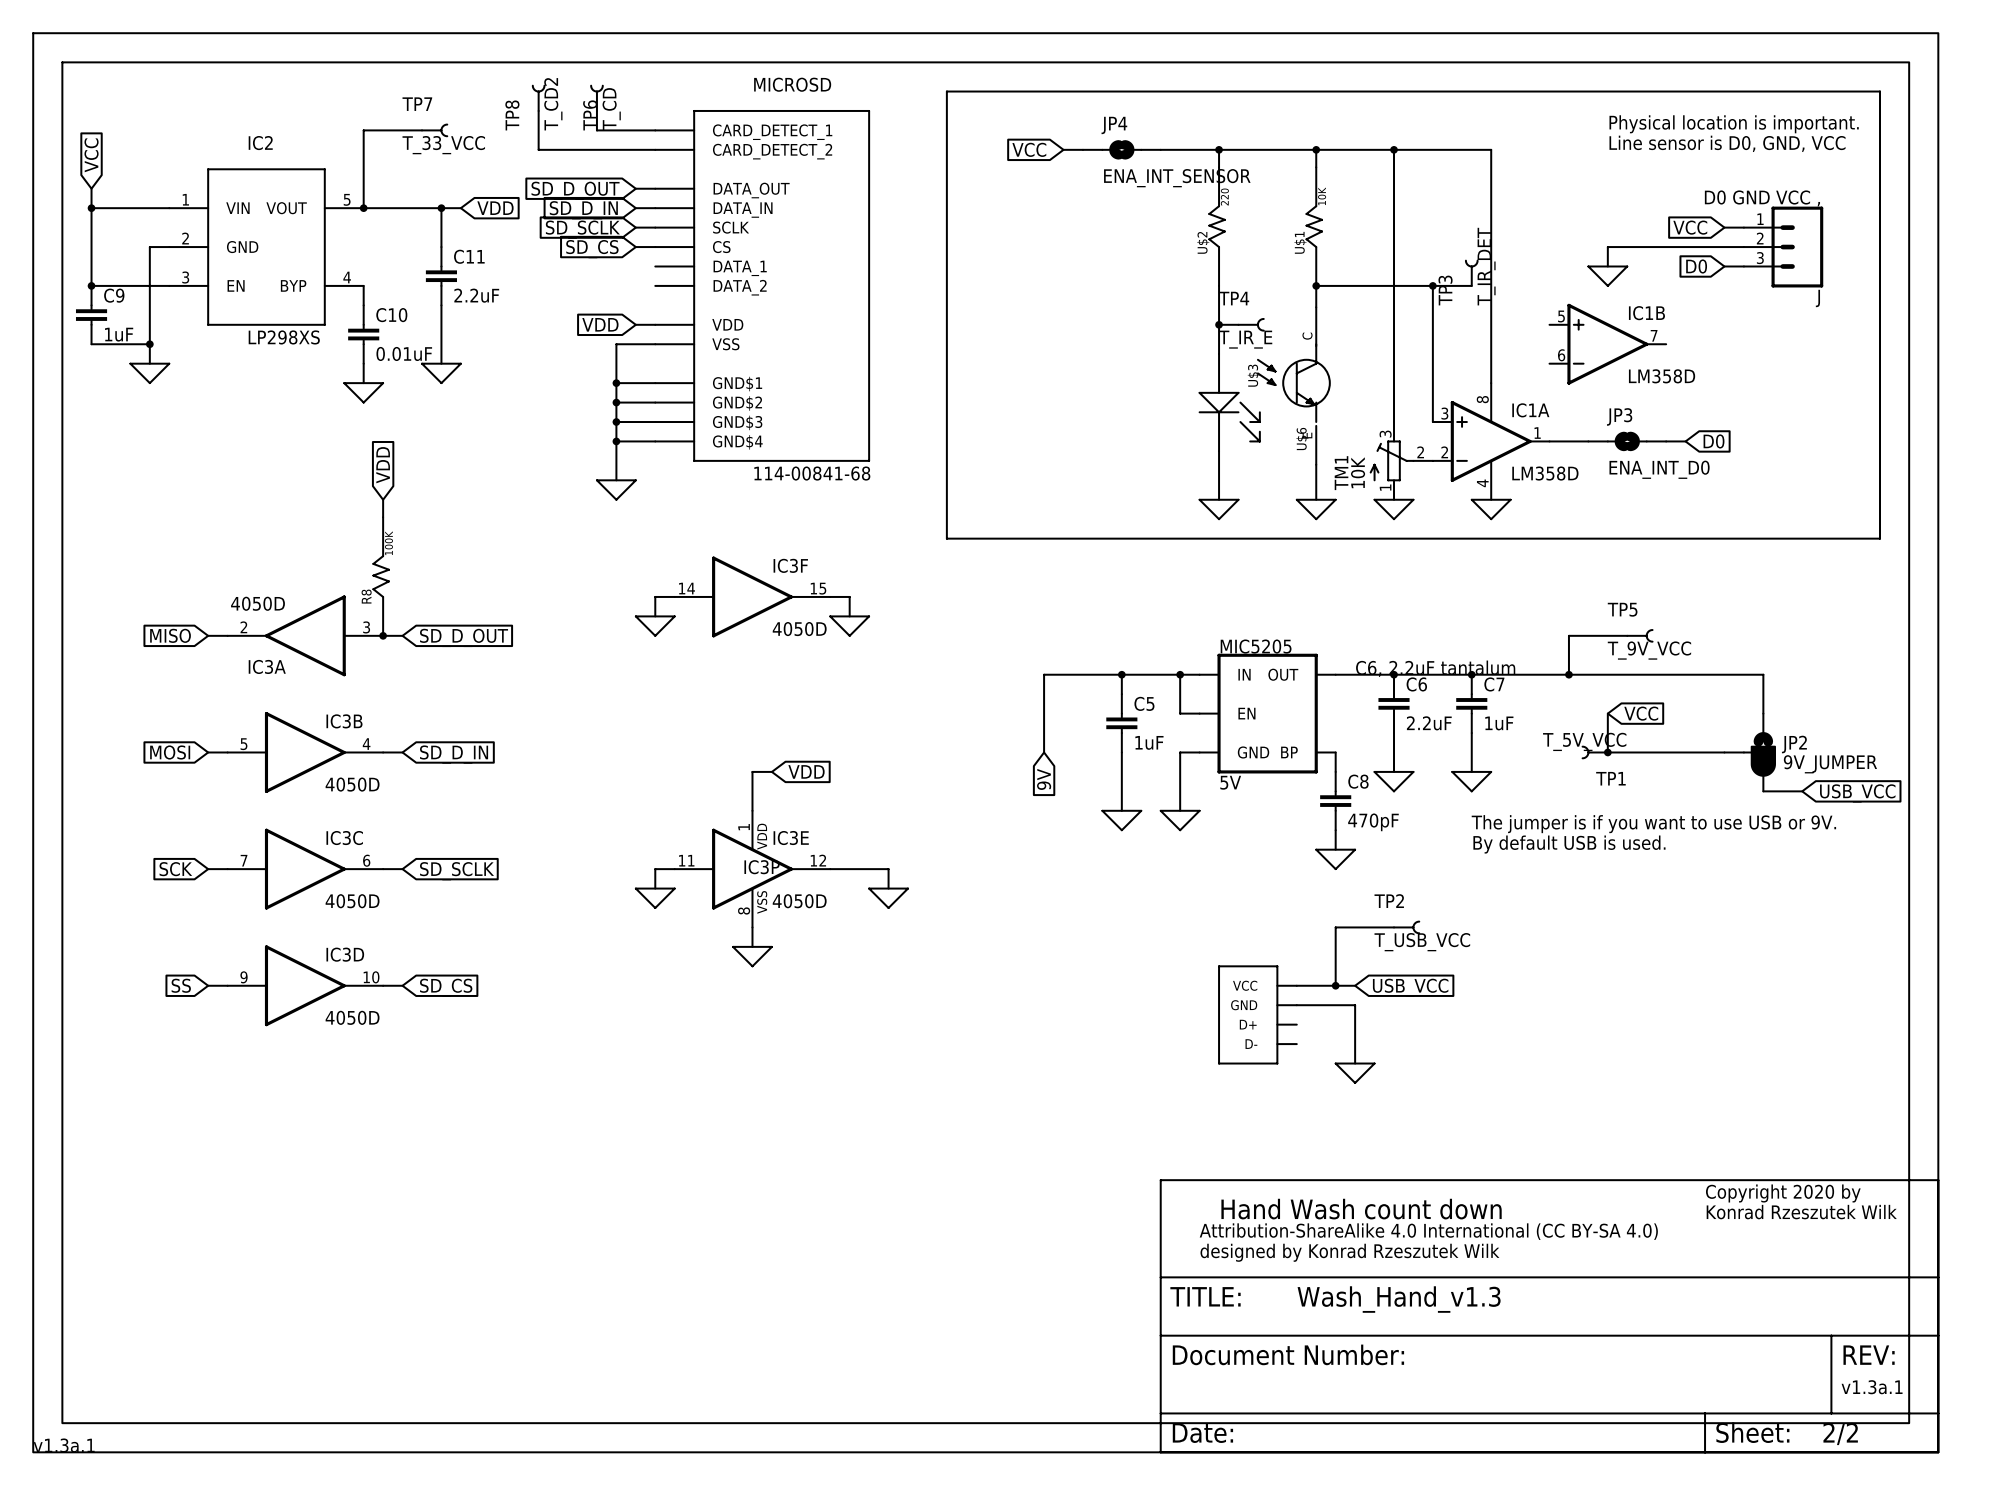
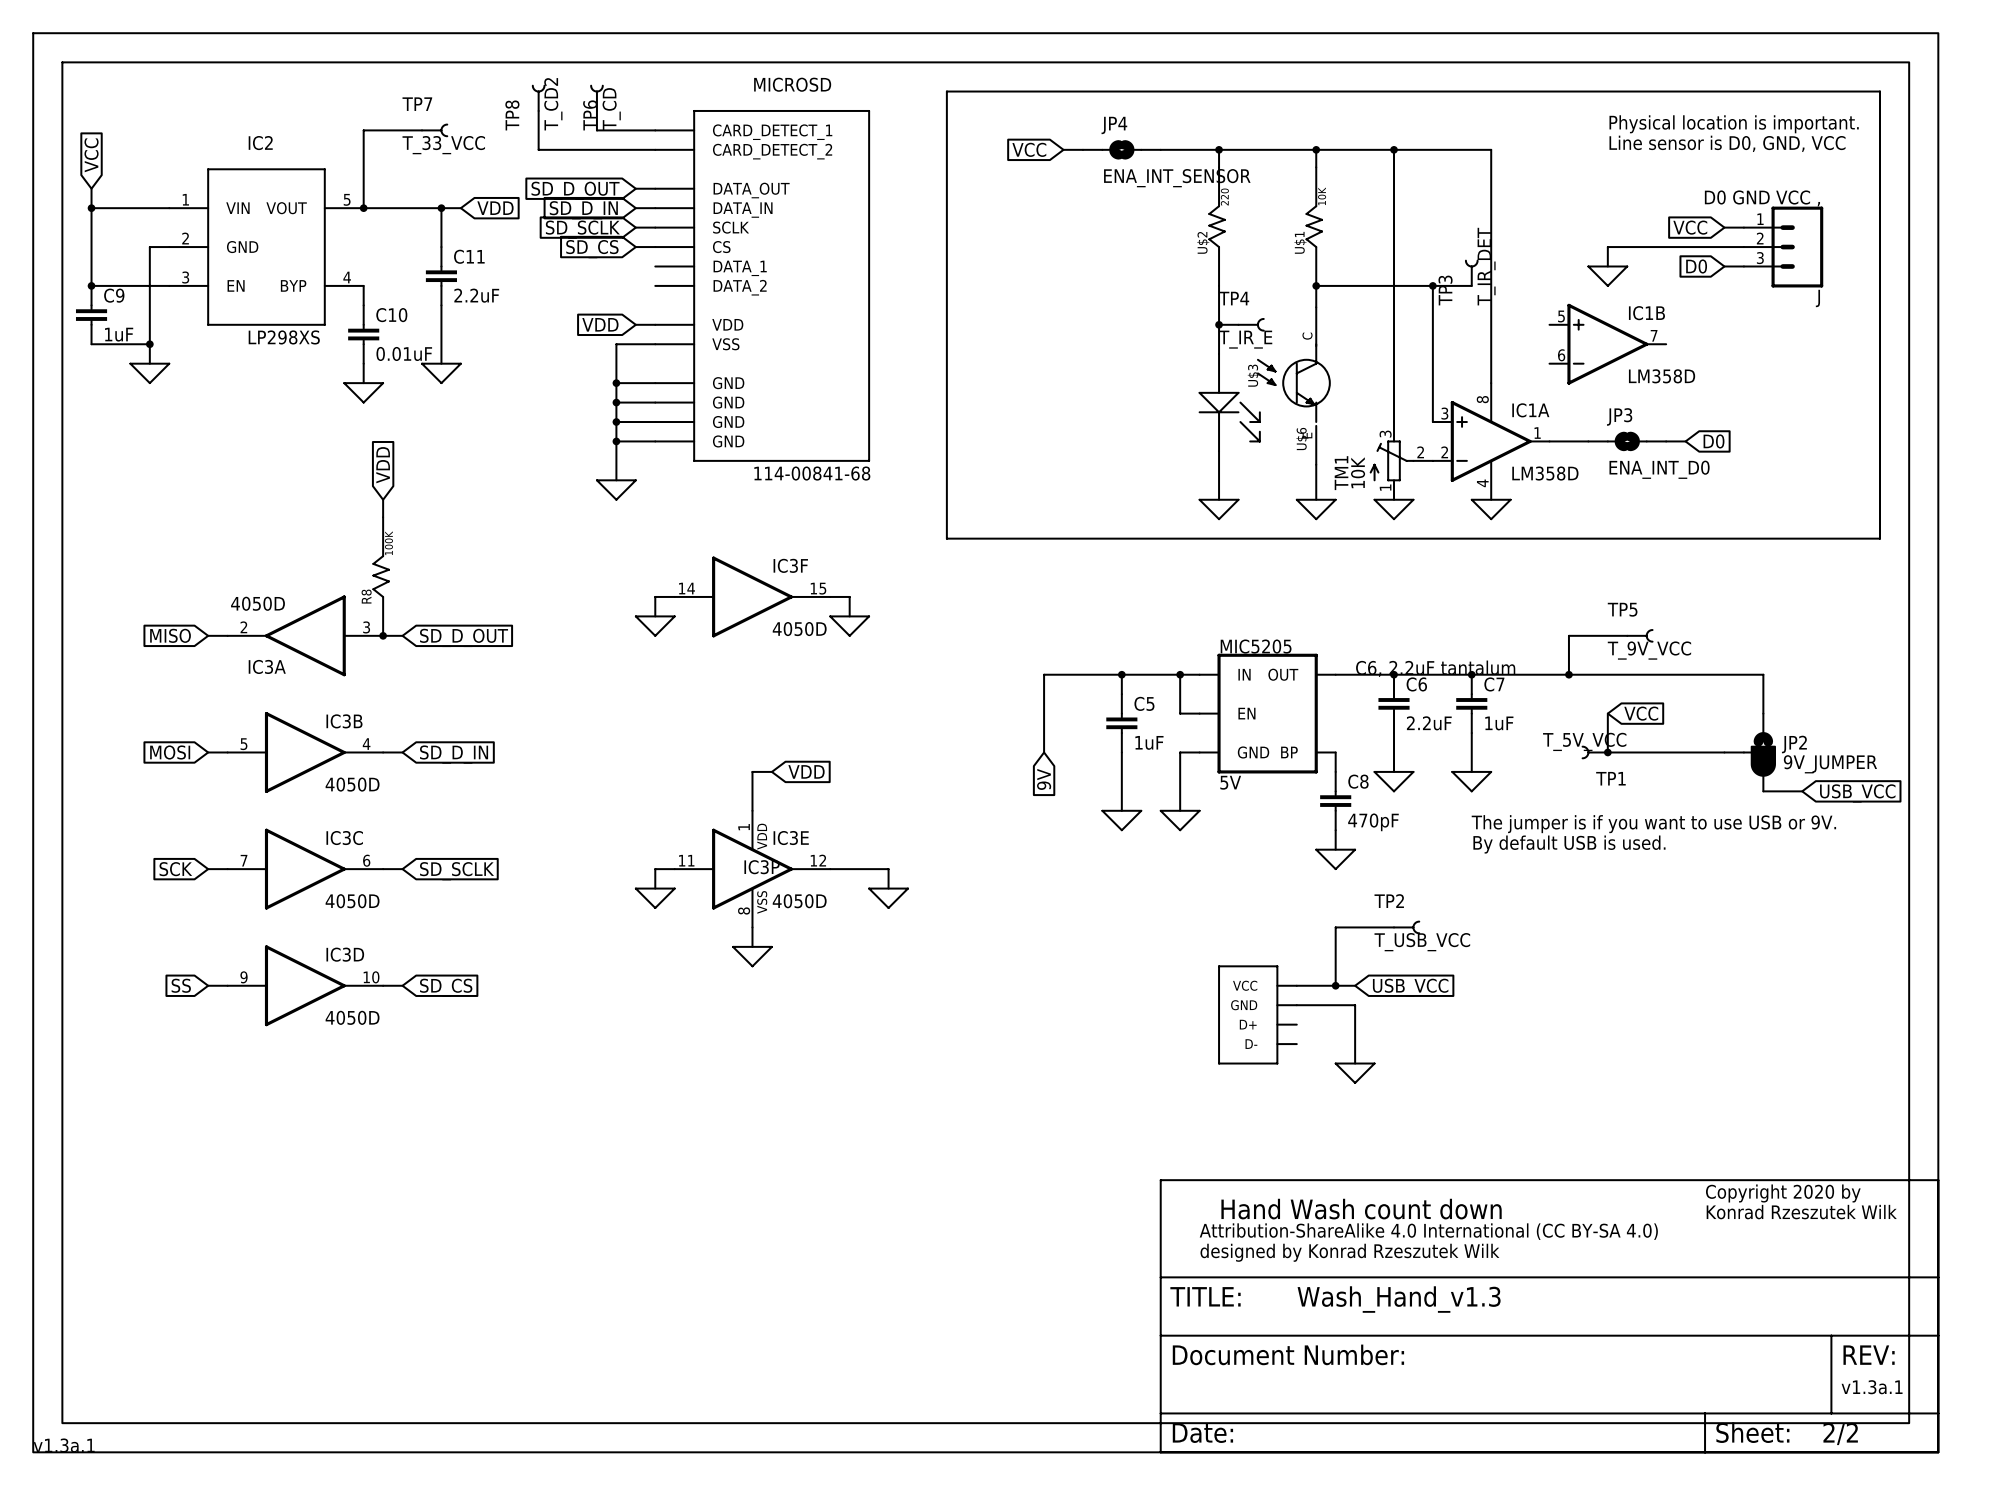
MICROSD pin name: GND$1 (737, 384) -> GND (728, 383)
MICROSD pin name: GND$2 (737, 403) -> GND (728, 402)
MICROSD pin name: GND$3 (737, 422) -> GND (728, 422)
MICROSD pin name: GND$4 (737, 442) -> GND (728, 441)

